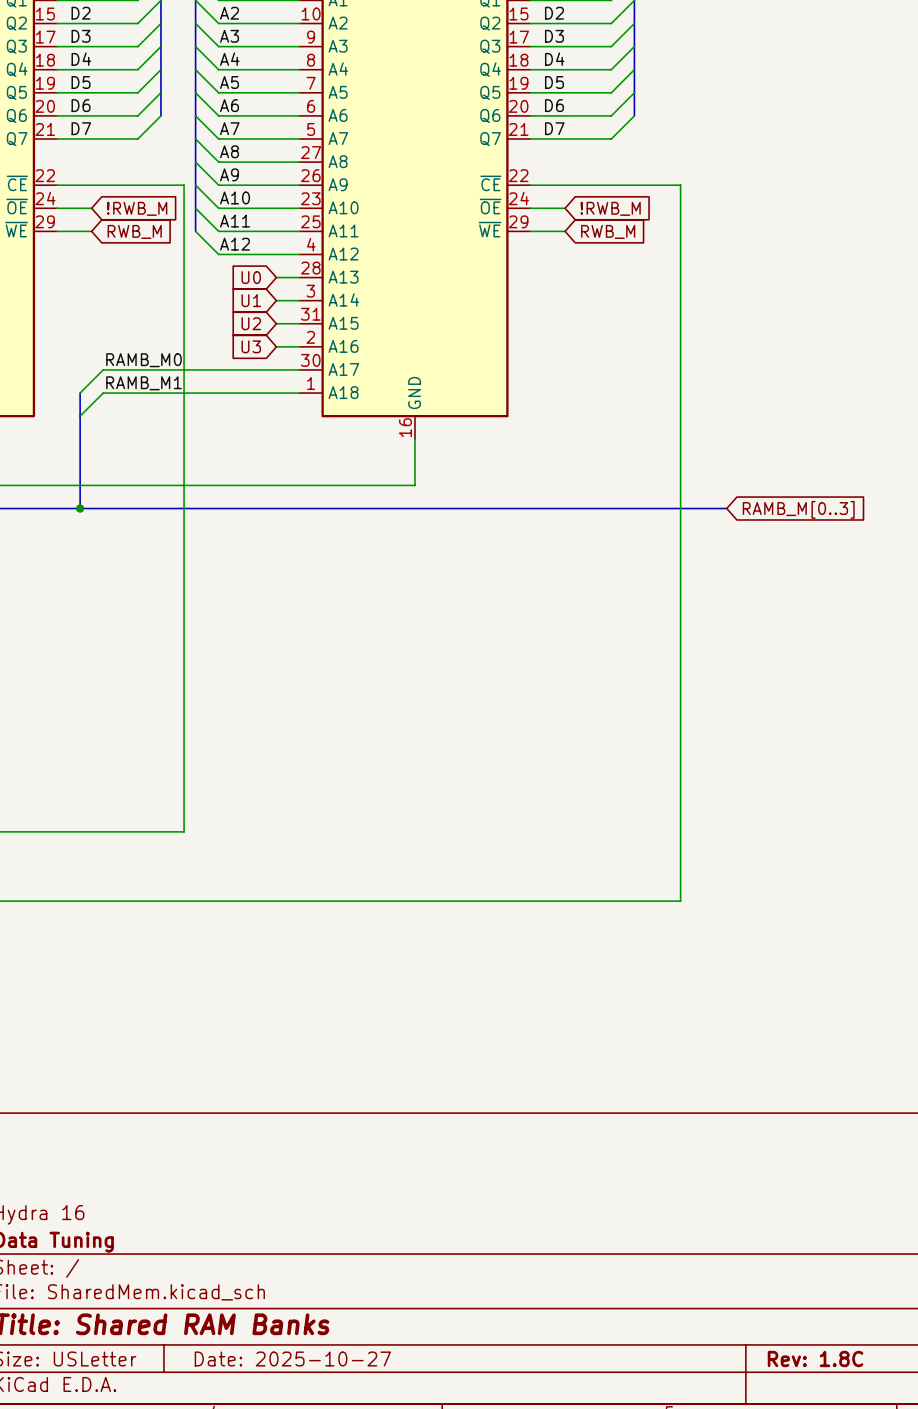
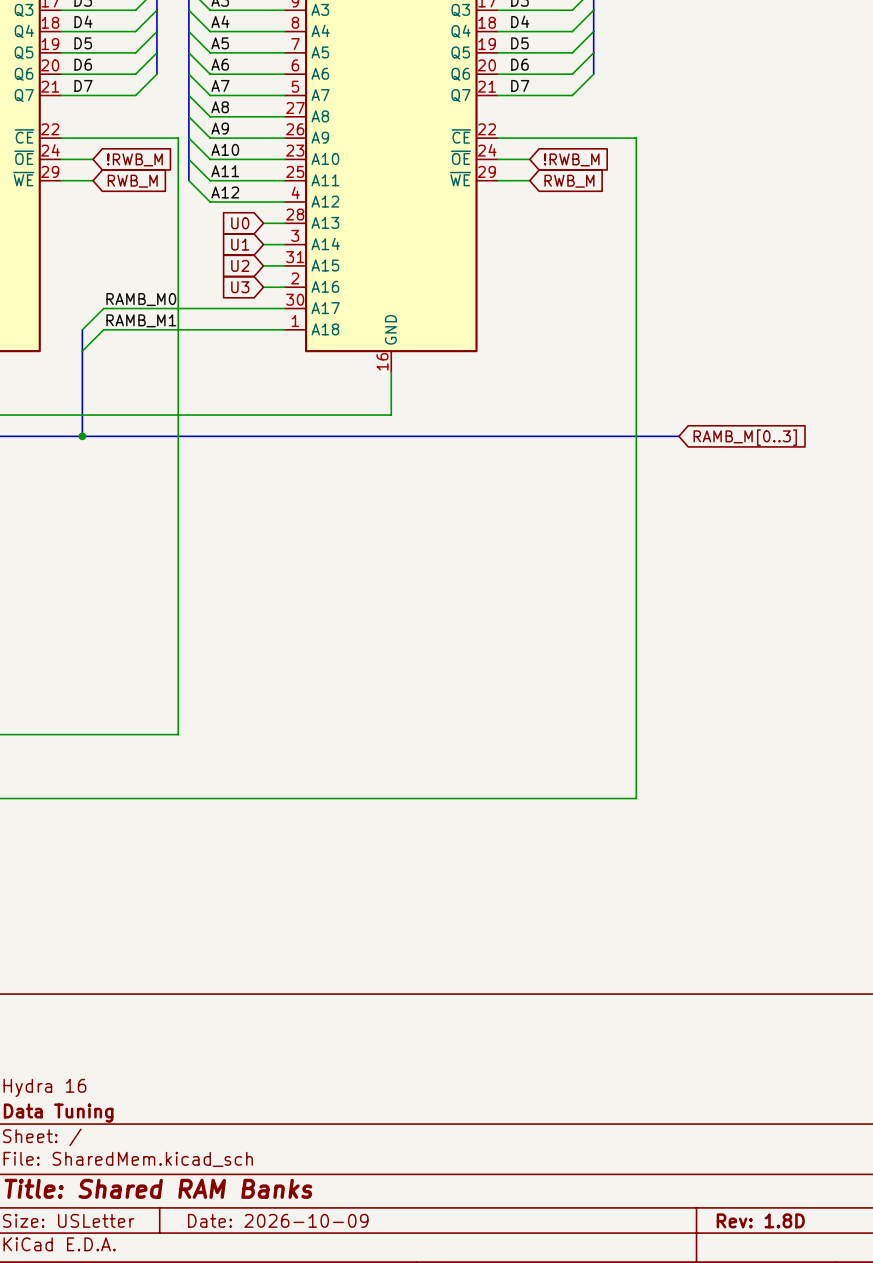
title block: Date: 2025-10-27 (292, 1359) -> Date: 2026-10-09 (278, 1220)
title block: Rev: 1.8C (815, 1359) -> Rev: 1.8D (760, 1220)

